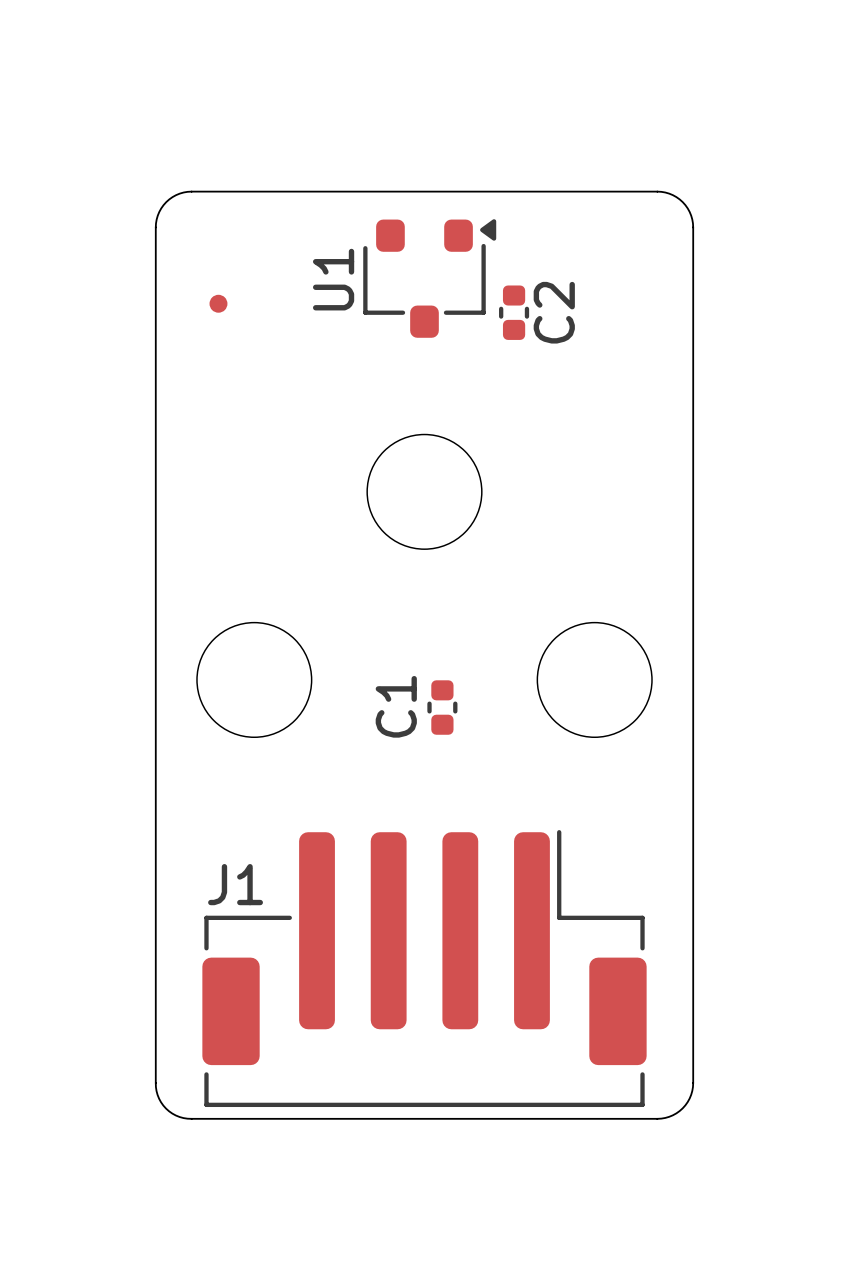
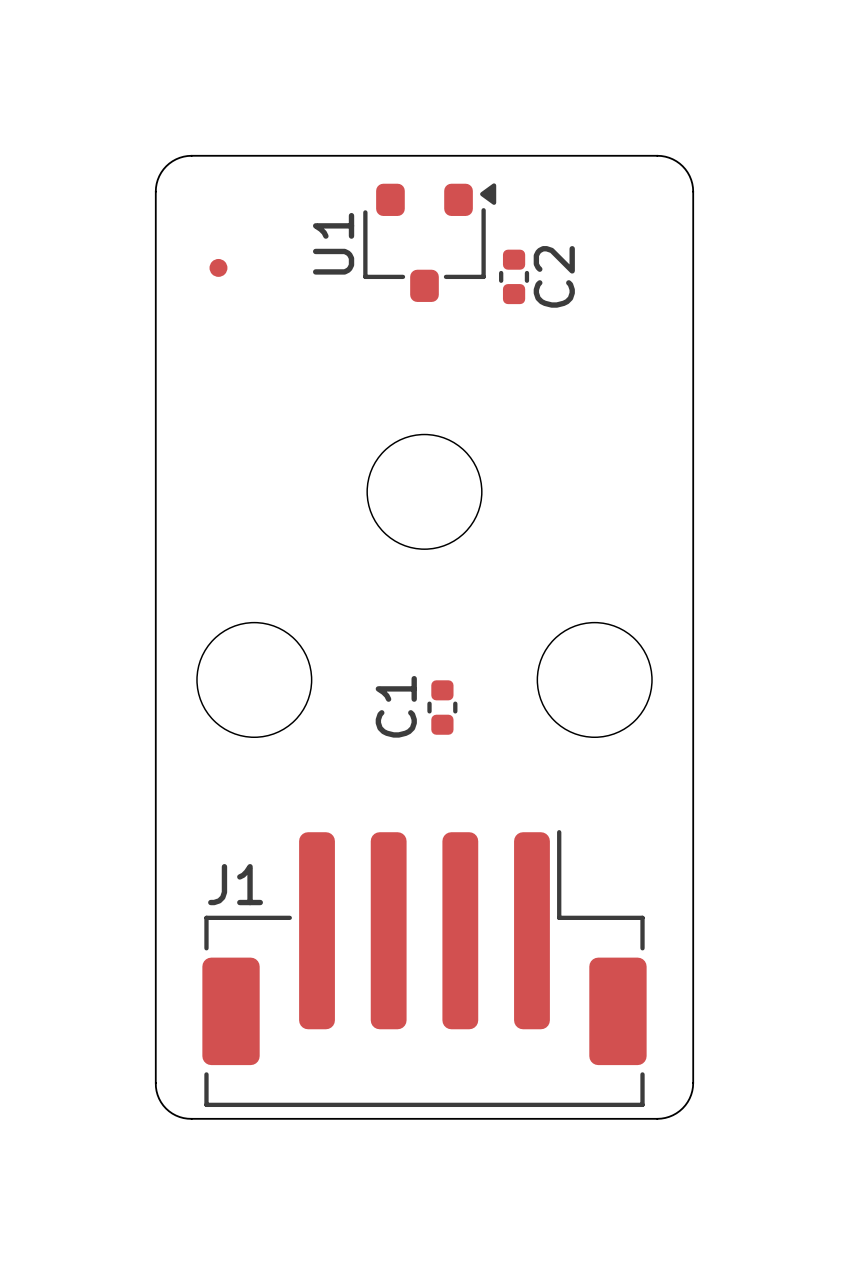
board edge: (155, 227) (159, 211) (166, 202) (176, 195) (191, 191) (661, 191) (676, 197) (685, 205) (691, 215) (693, 227) -> (155, 227) (156, 187) (159, 176) (172, 161) (191, 155) (661, 156) (679, 163) (689, 176) (692, 187) (693, 227)
U1 position: (429, 278) -> (429, 242)
part position: (218, 303) -> (218, 267)
C2 position: (514, 312) -> (514, 276)

